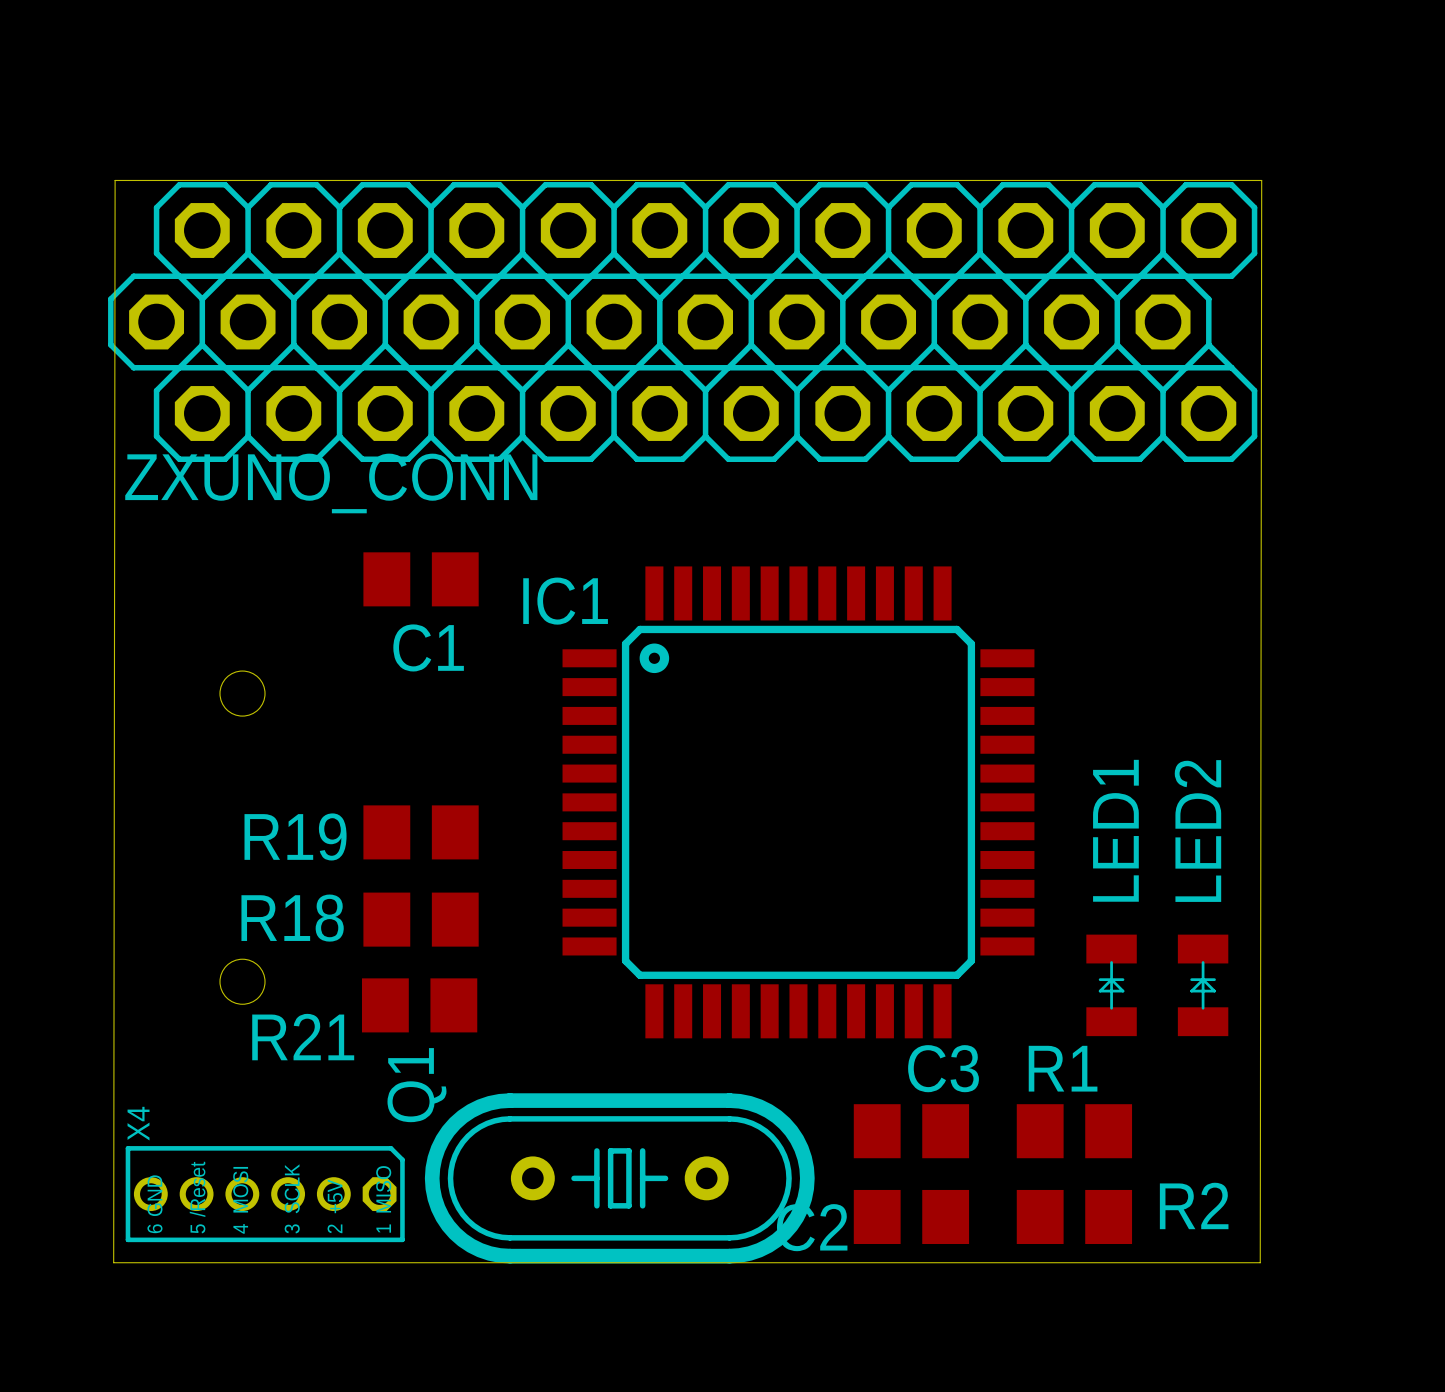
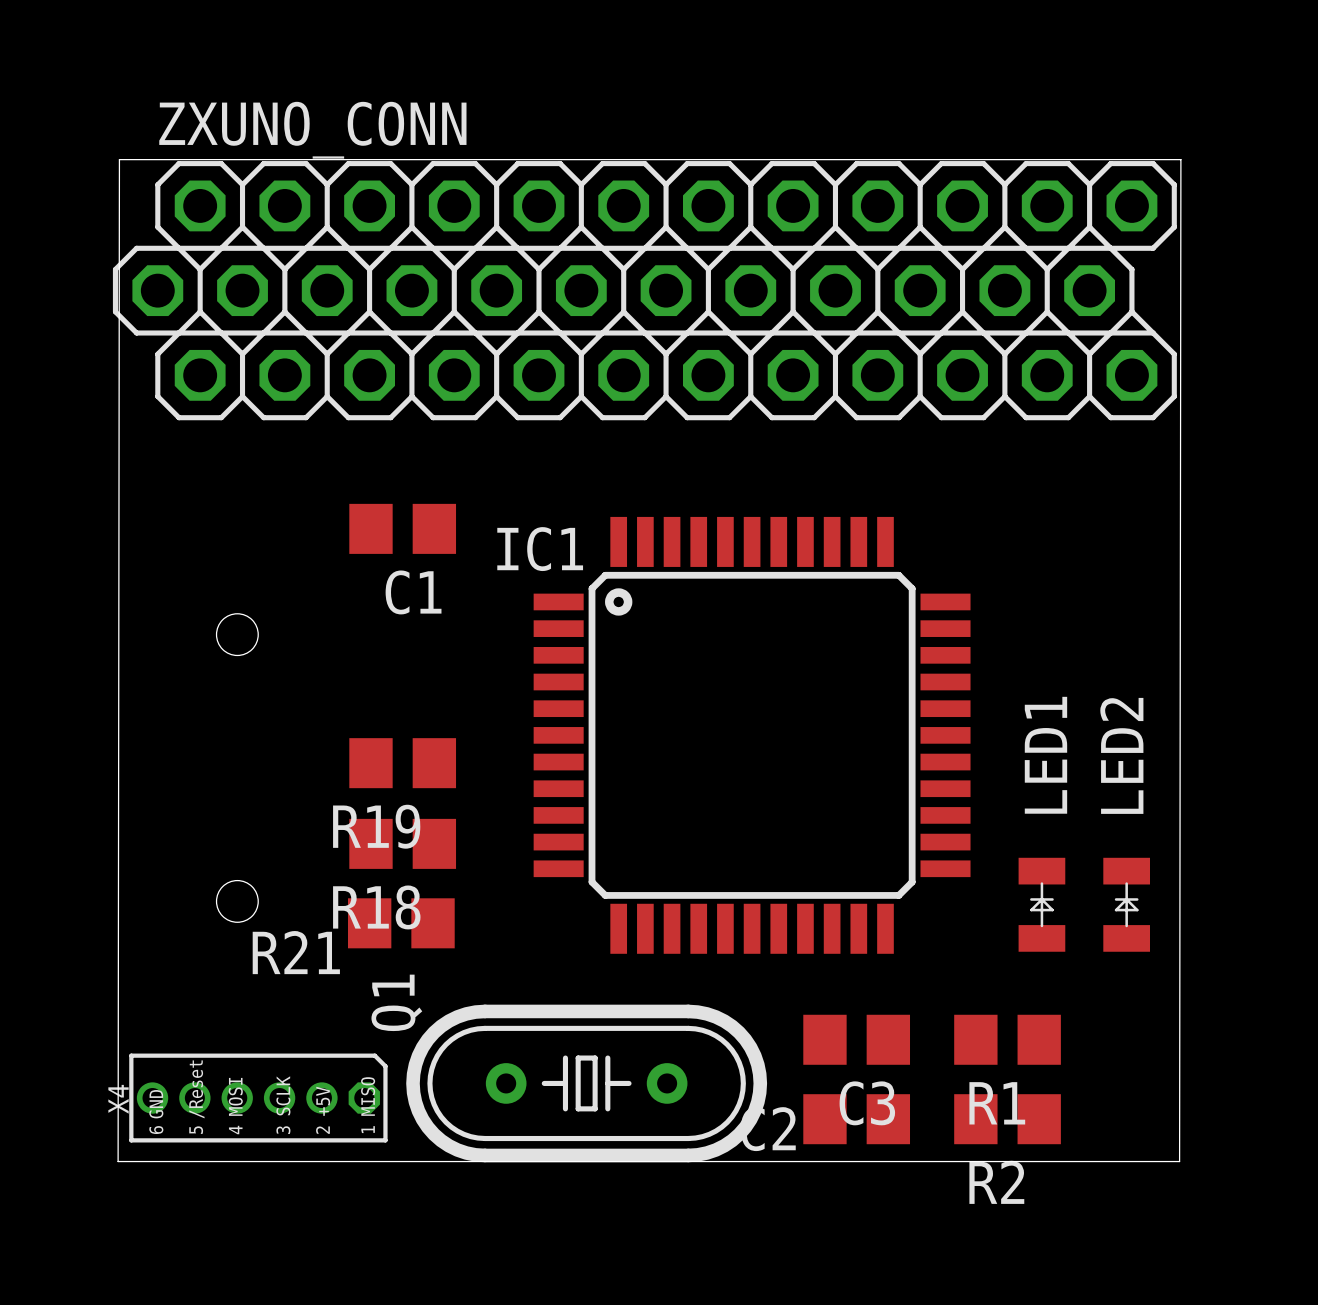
ZXUNO_CONN name position: ZXUNO_CONN (331, 483) -> ZXUNO_CONN (312, 130)
R19 name position: R19 (295, 836) -> R19 (376, 826)
R18 name position: R18 (292, 918) -> R18 (376, 907)
C3 name position: C3 (943, 1068) -> C3 (867, 1103)
R1 name position: R1 (1063, 1068) -> R1 (997, 1103)
X4 name position: X4 (138, 1123) -> X4 (118, 1099)
R2 name position: R2 (1194, 1205) -> R2 (996, 1182)

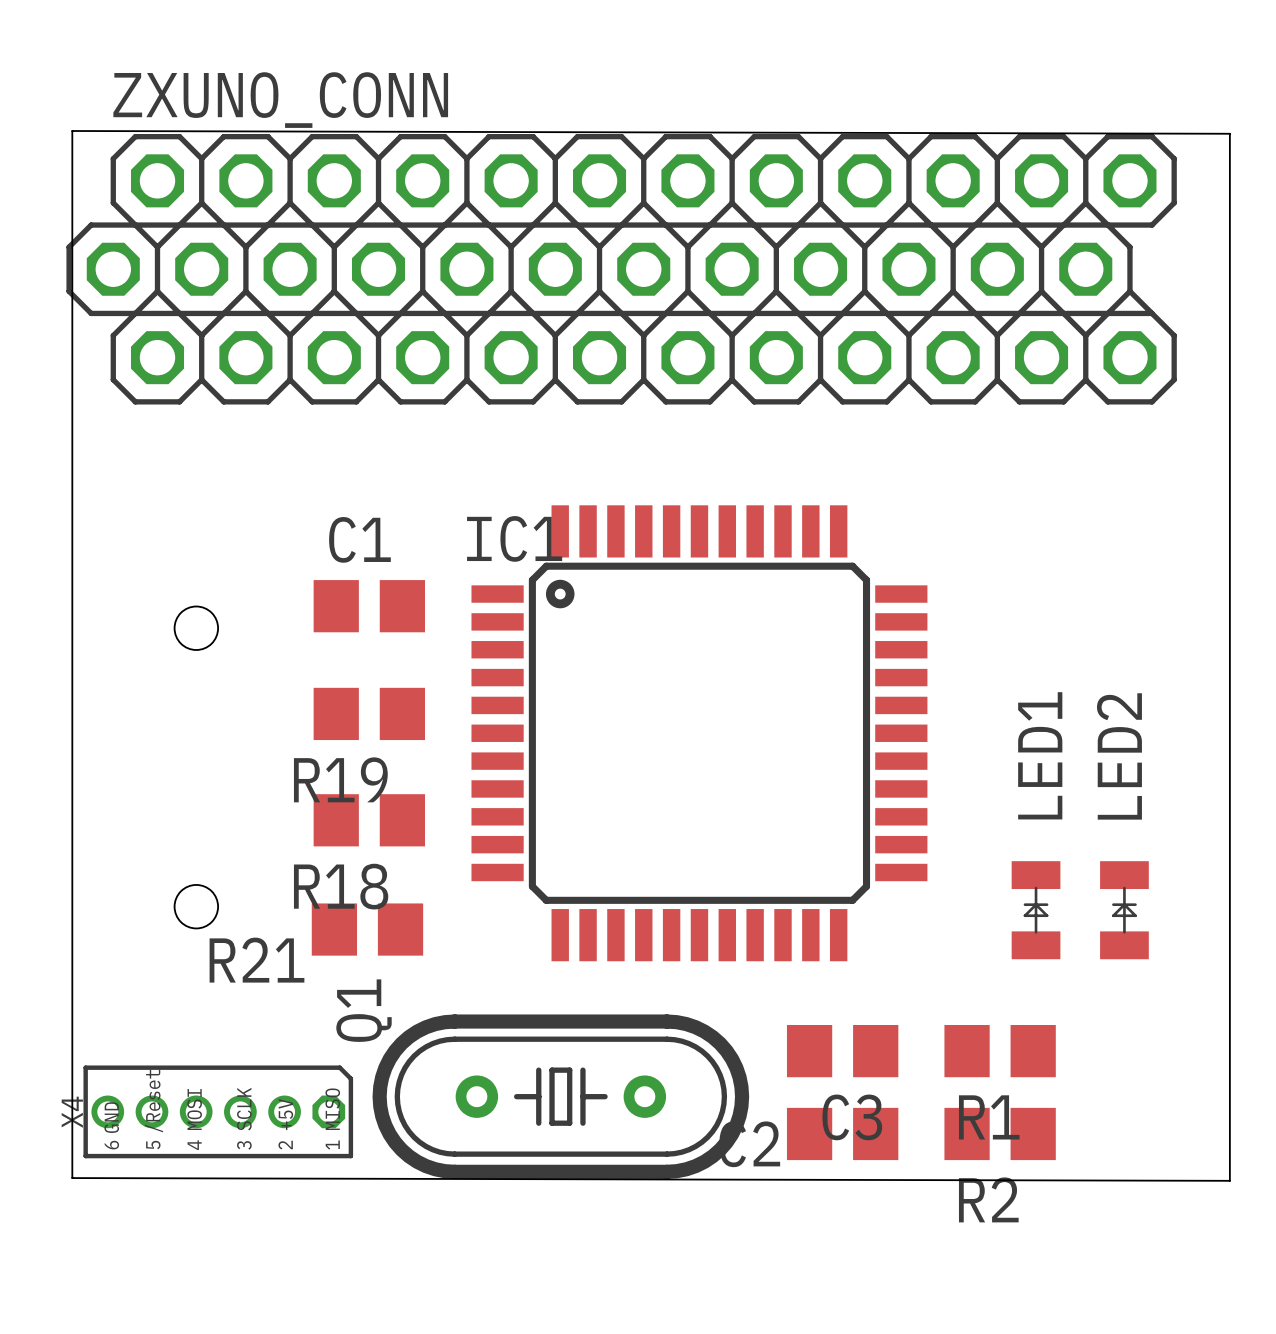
board edge: (119, 159) (1180, 159) (1179, 1161) (118, 1161) (119, 159) -> (72, 131) (72, 1178) (1229, 1180) (1229, 133) (72, 131)
C1 position: (402, 528) -> (369, 606)
C1 name position: C1 (413, 592) -> C1 (359, 539)
IC1 position: (752, 735) -> (699, 733)
R19 position: (402, 763) -> (369, 713)
R18 position: (402, 843) -> (369, 820)

